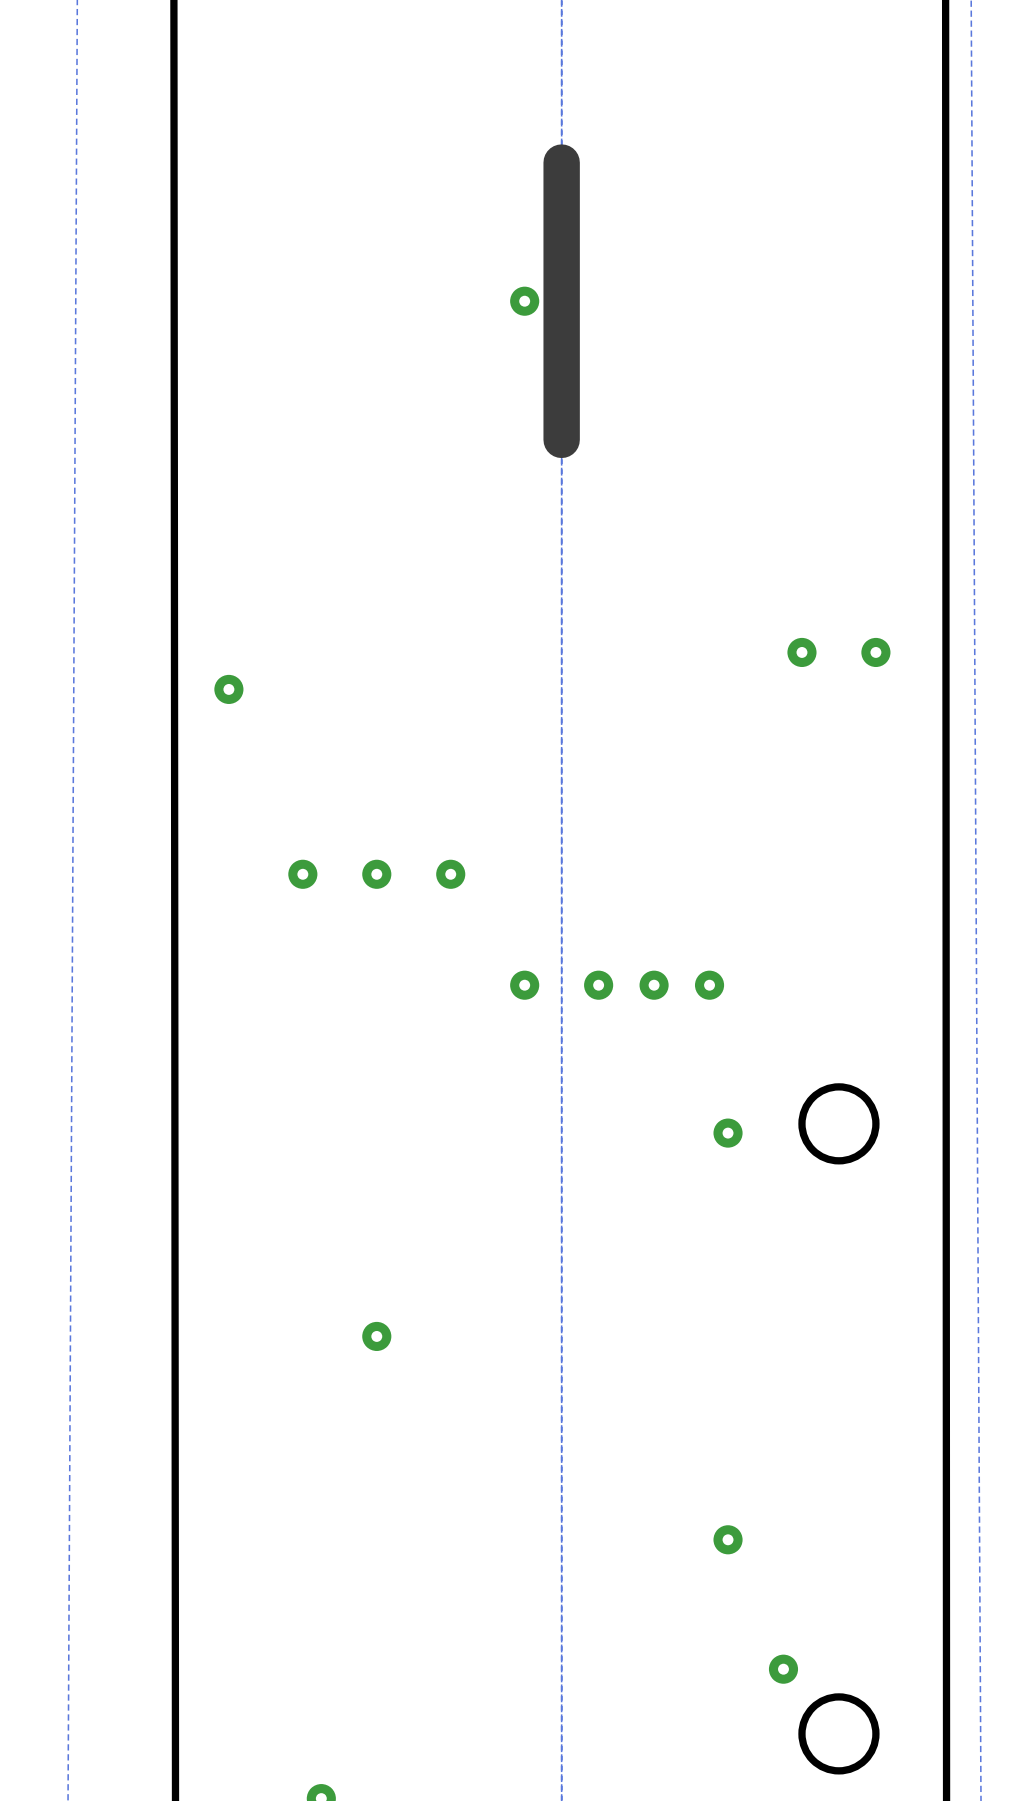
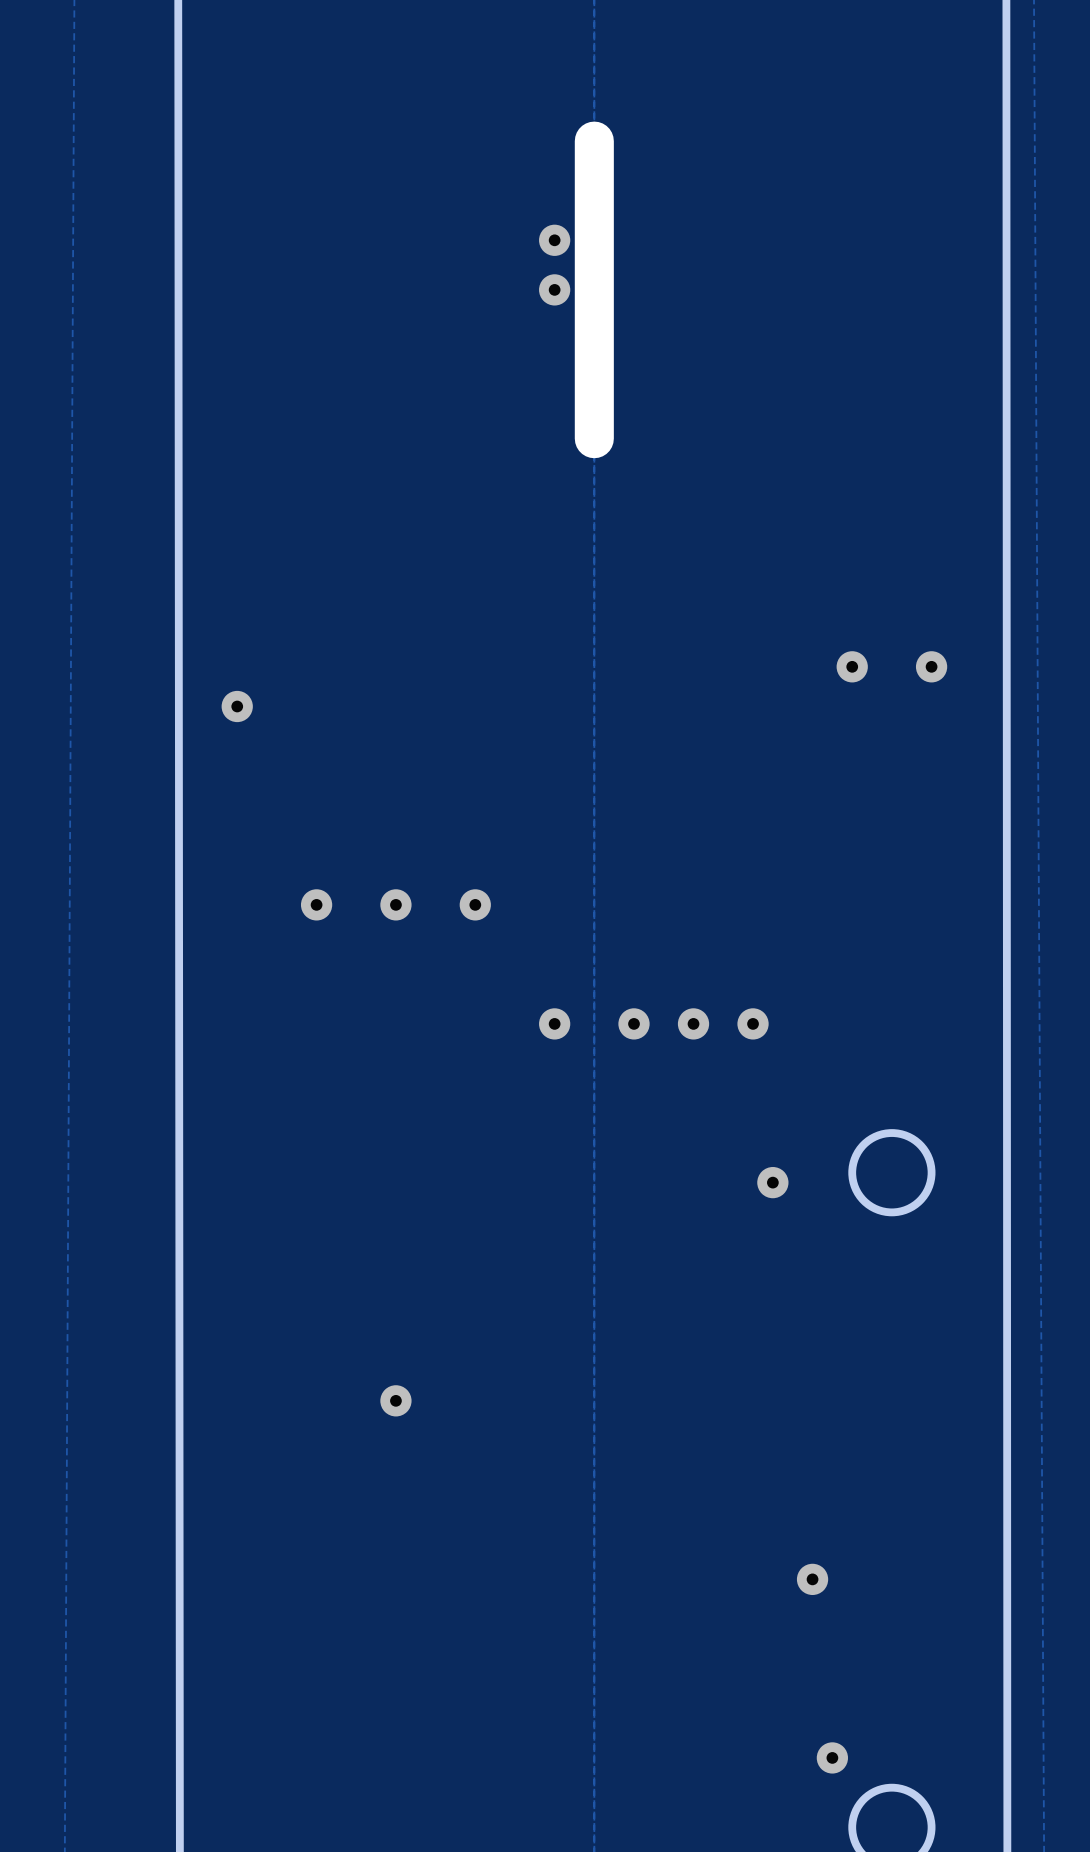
via: none -> (554, 240)
via position: (728, 1539) -> (812, 1579)

